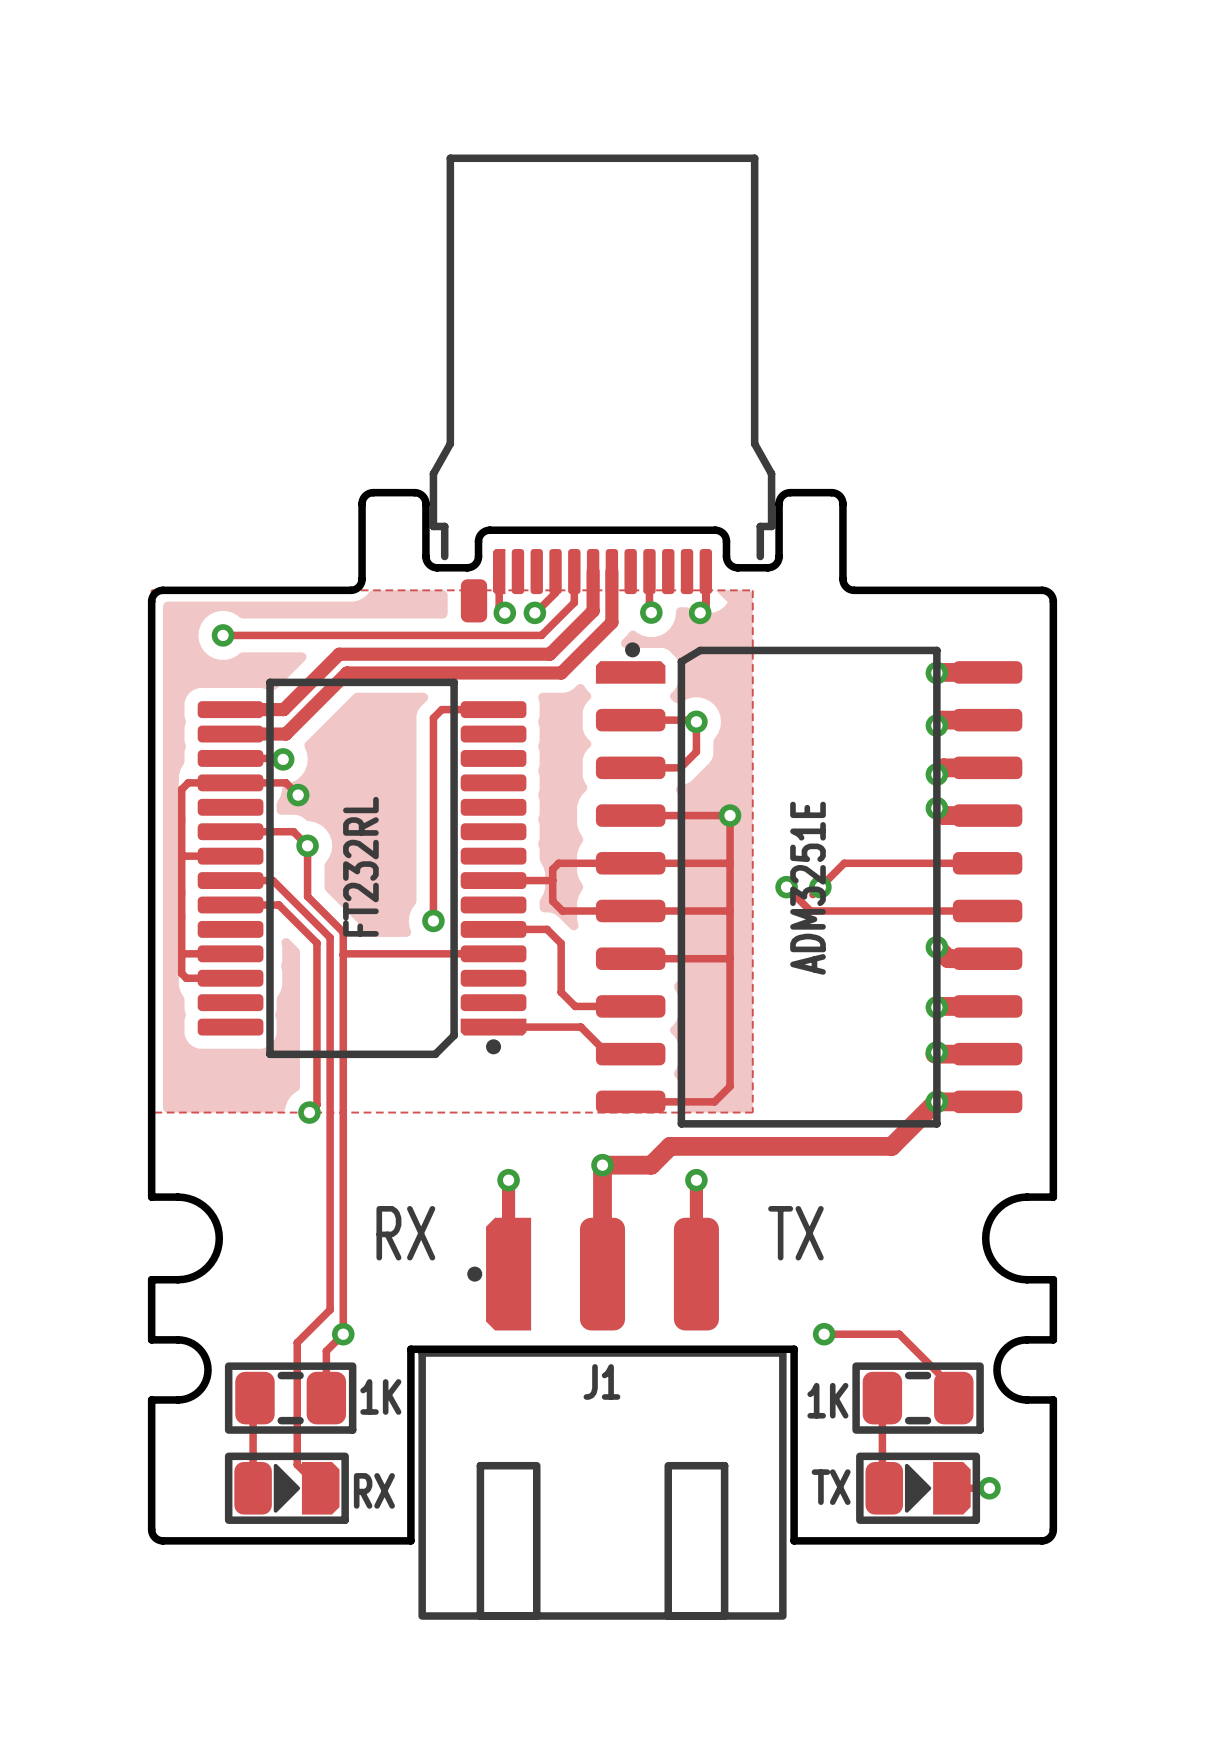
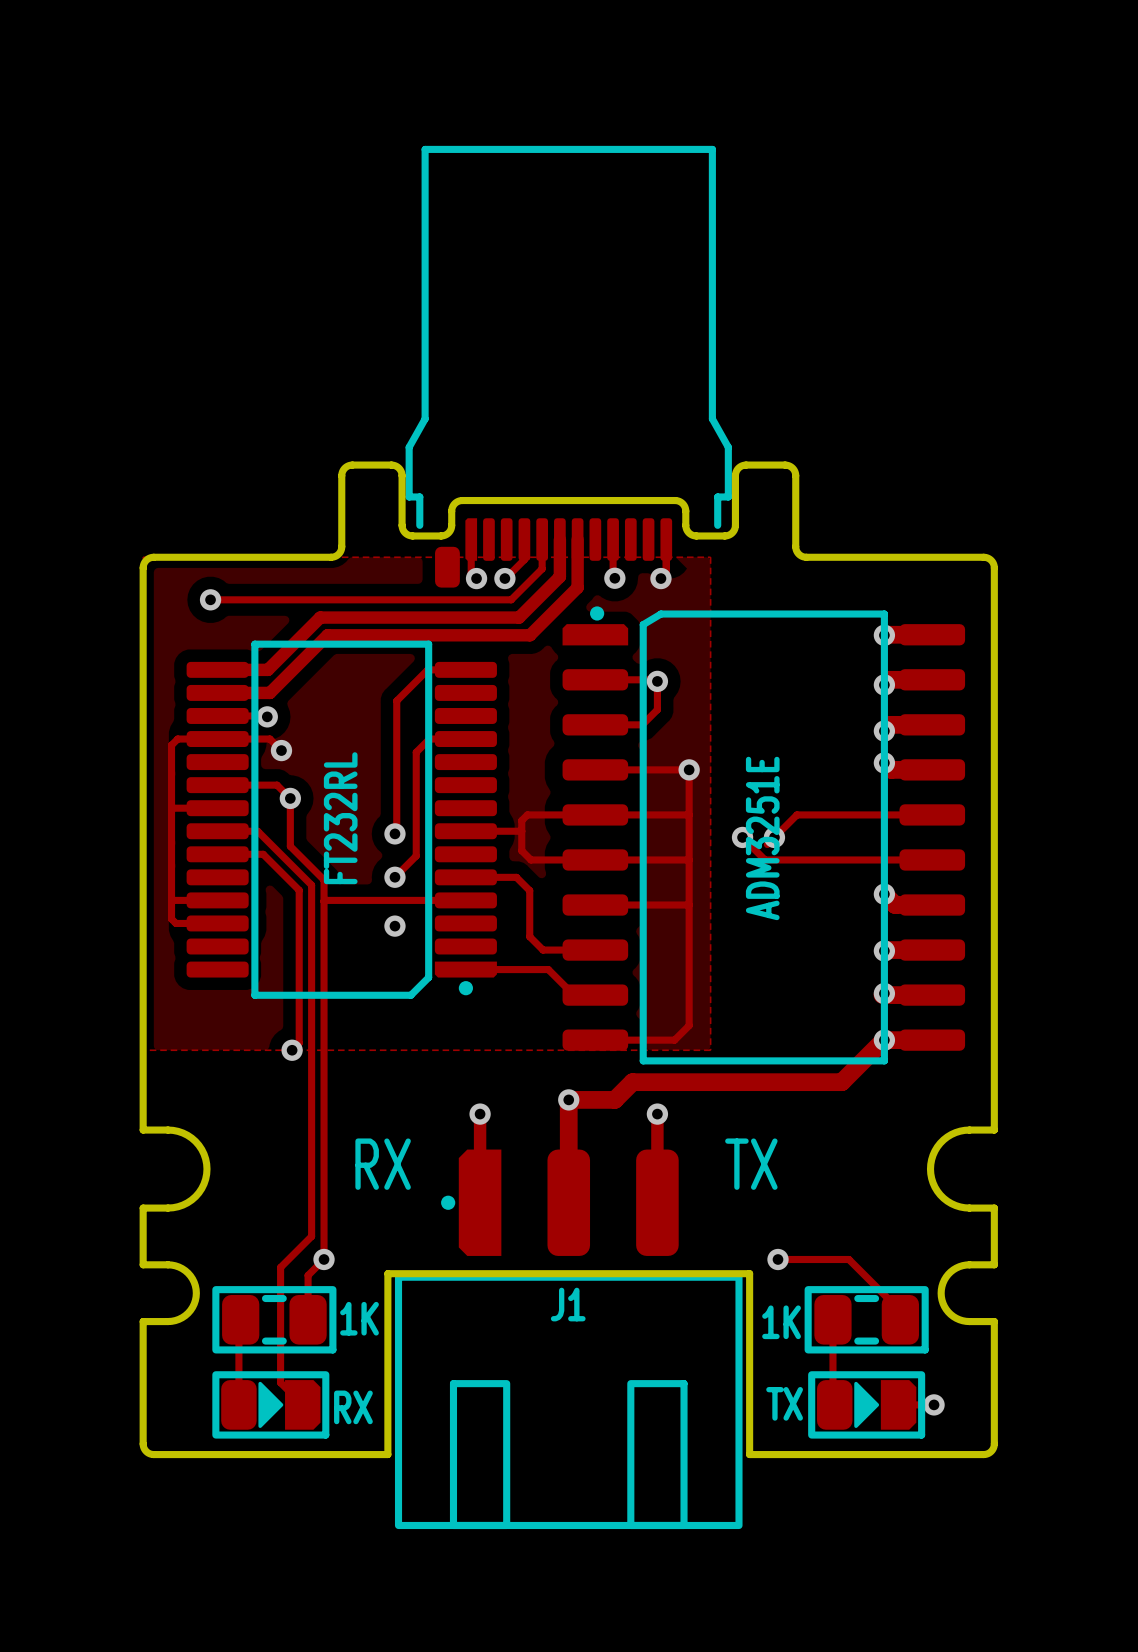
track: (453, 709) (441, 709) (433, 718) (433, 920) -> (427, 669) (396, 700) (396, 832) (394, 833)
track: none -> (465, 739) (429, 739) (416, 752) (416, 855) (394, 877)
via: none -> (394, 833)
via position: (433, 920) -> (394, 877)
via: none -> (394, 926)

